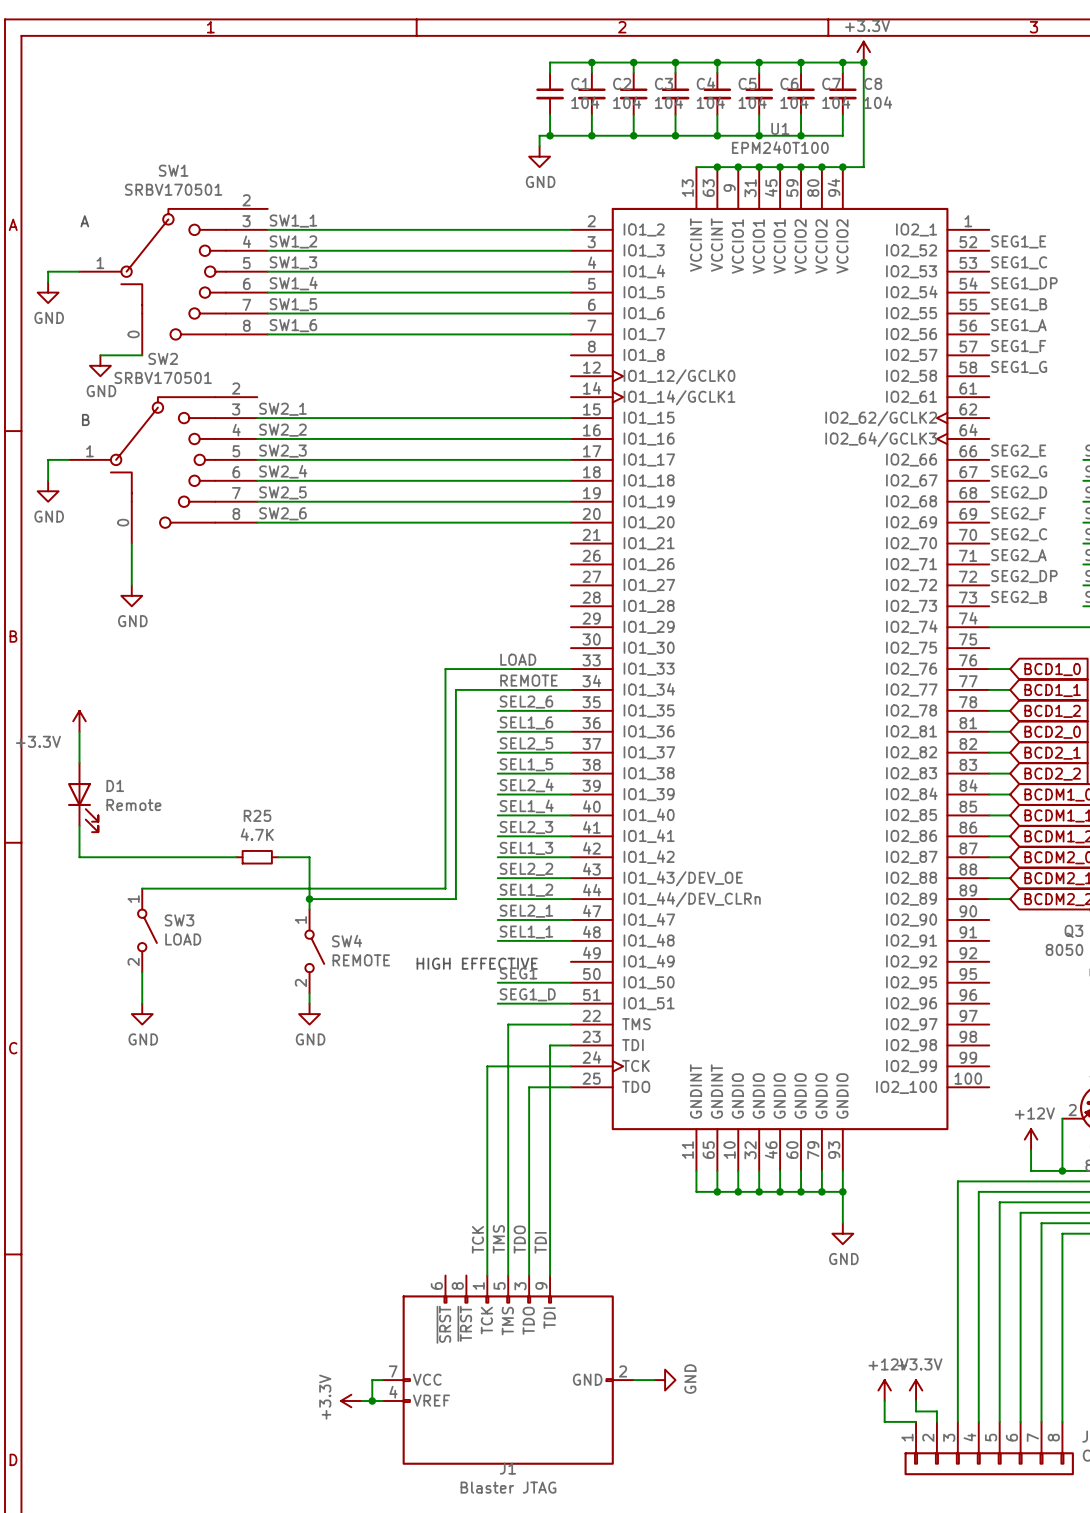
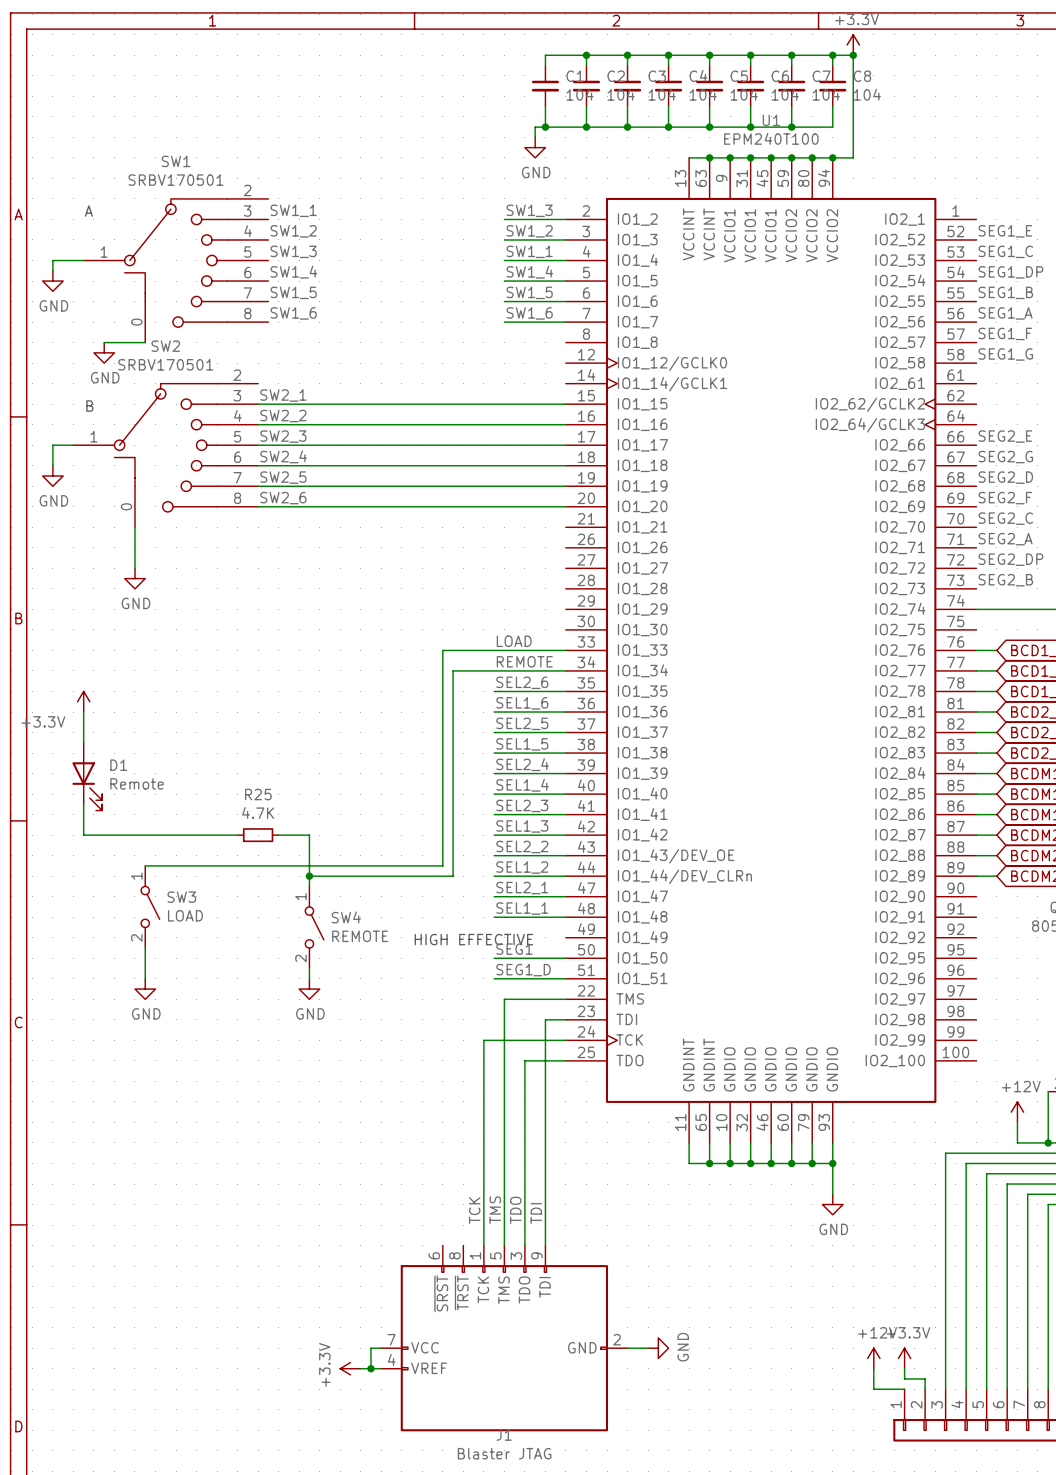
label: none -> SW1_3 (529, 210)
wire: (267, 229) (508, 229) -> none
label: none -> SW1_2 (529, 231)
wire: (267, 250) (508, 250) -> none
label: none -> SW1_1 (529, 251)
wire: (267, 271) (508, 271) -> none
label: none -> SW1_4 (529, 272)
wire: (267, 292) (508, 292) -> none
label: none -> SW1_5 (529, 292)
wire: (267, 313) (508, 313) -> none
label: none -> SW1_6 (529, 313)
wire: (267, 334) (508, 334) -> none

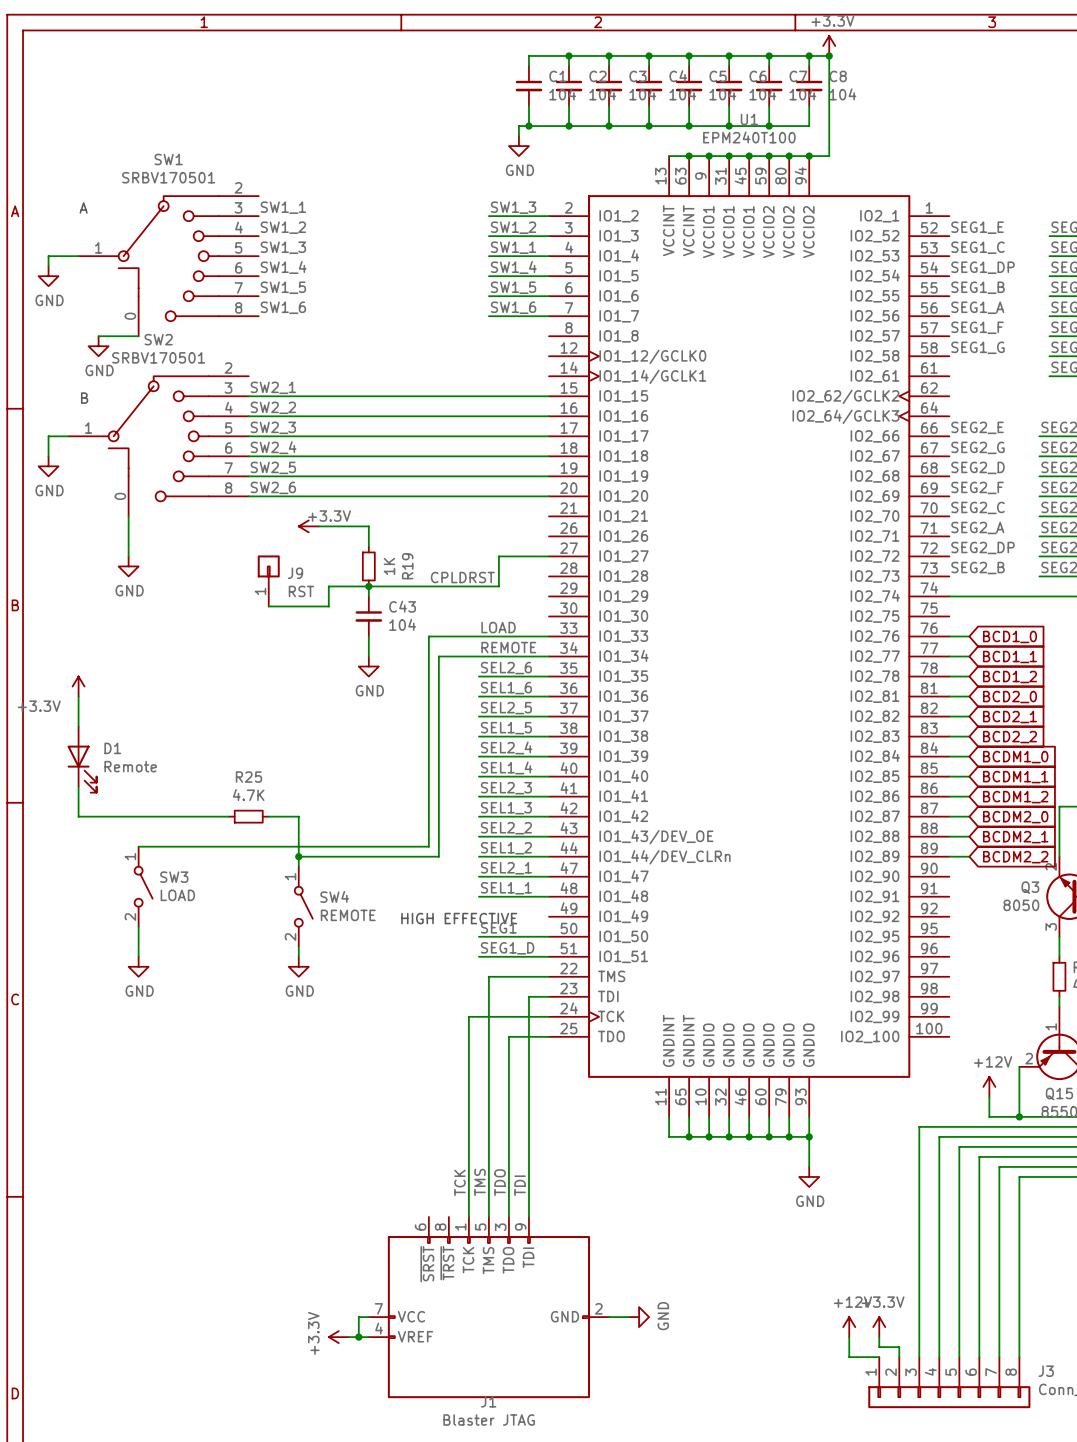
power symbol: none -> +3.3V (308, 526)
wire: none -> (318, 526) (368, 526) (368, 546)
wire: none -> (548, 556) (498, 556) (498, 586) (328, 586) (328, 606) (268, 606)
R19: none -> 1K (368, 566)
label: none -> CPLDRST (462, 577)
J9: none -> RST (268, 580)
wire: none -> (368, 586) (368, 596)
junction: none -> (368, 586)
C43: none -> 104 (368, 616)
wire: none -> (368, 636) (368, 656)
power symbol: none -> GND (368, 666)

